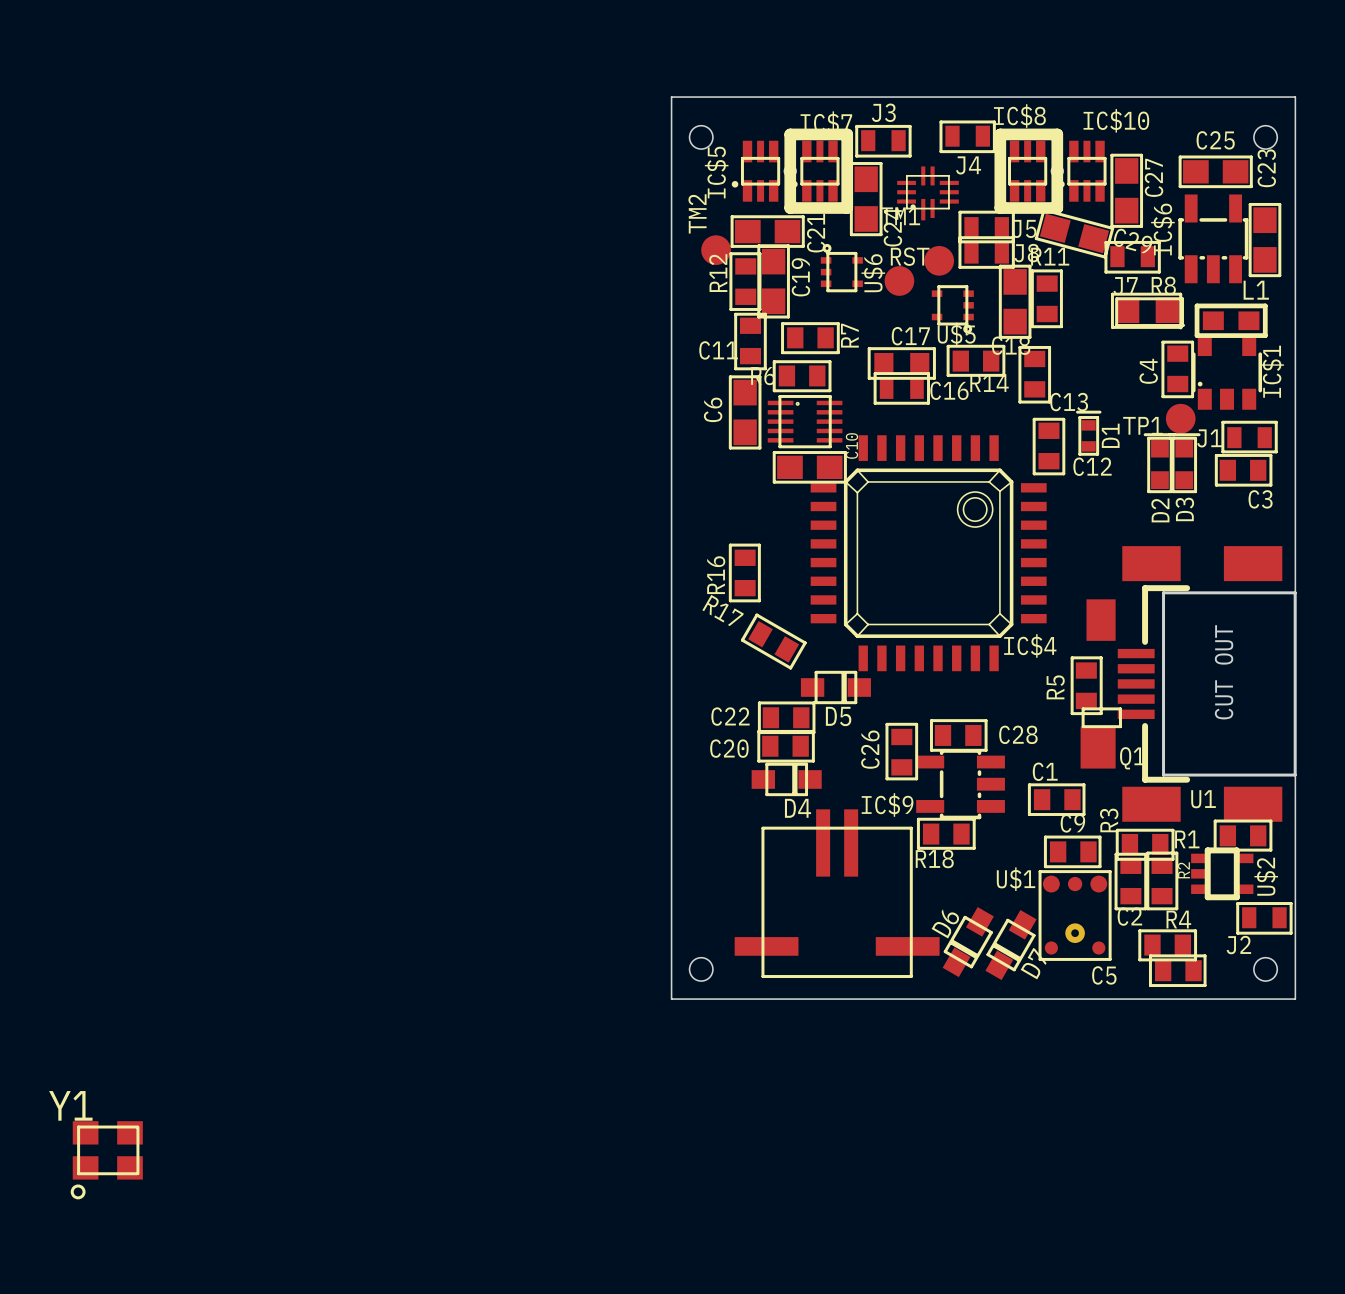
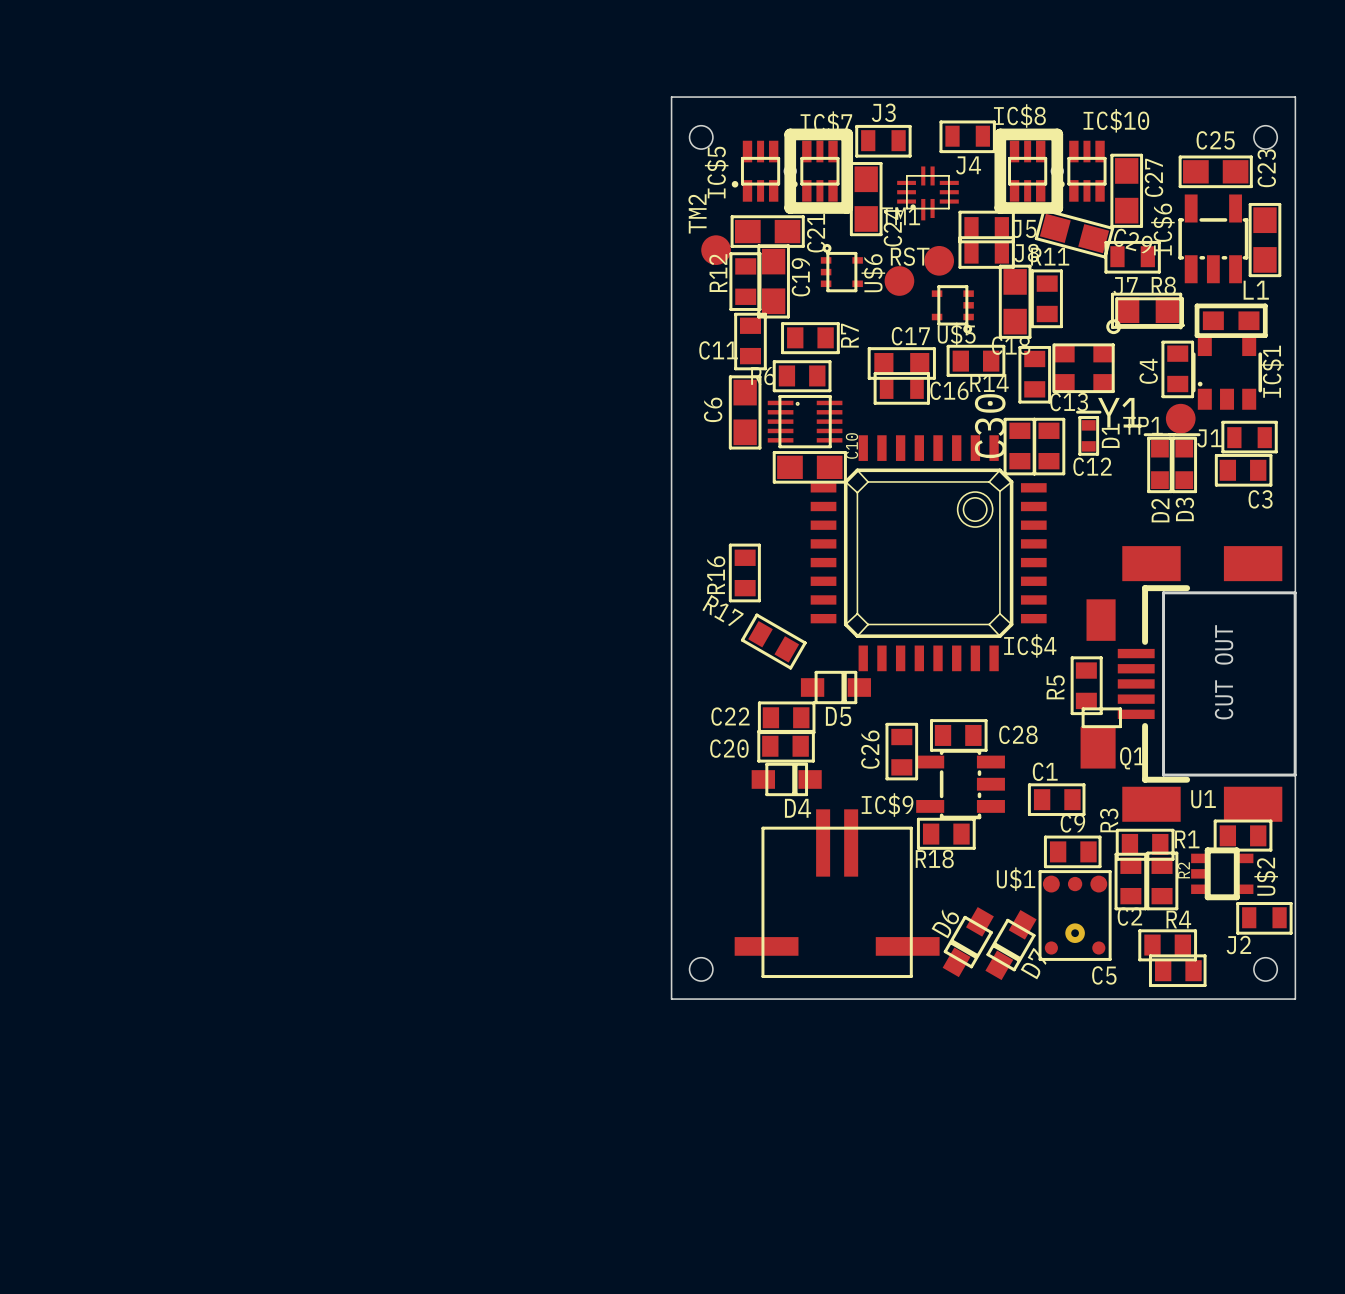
C30: none -> (1019, 446)
Y1 name position: Y1 (70, 1105) -> Y1 (1119, 412)
Y1 footprint: [70, 1121, 143, 1200] -> [1052, 319, 1122, 394]

